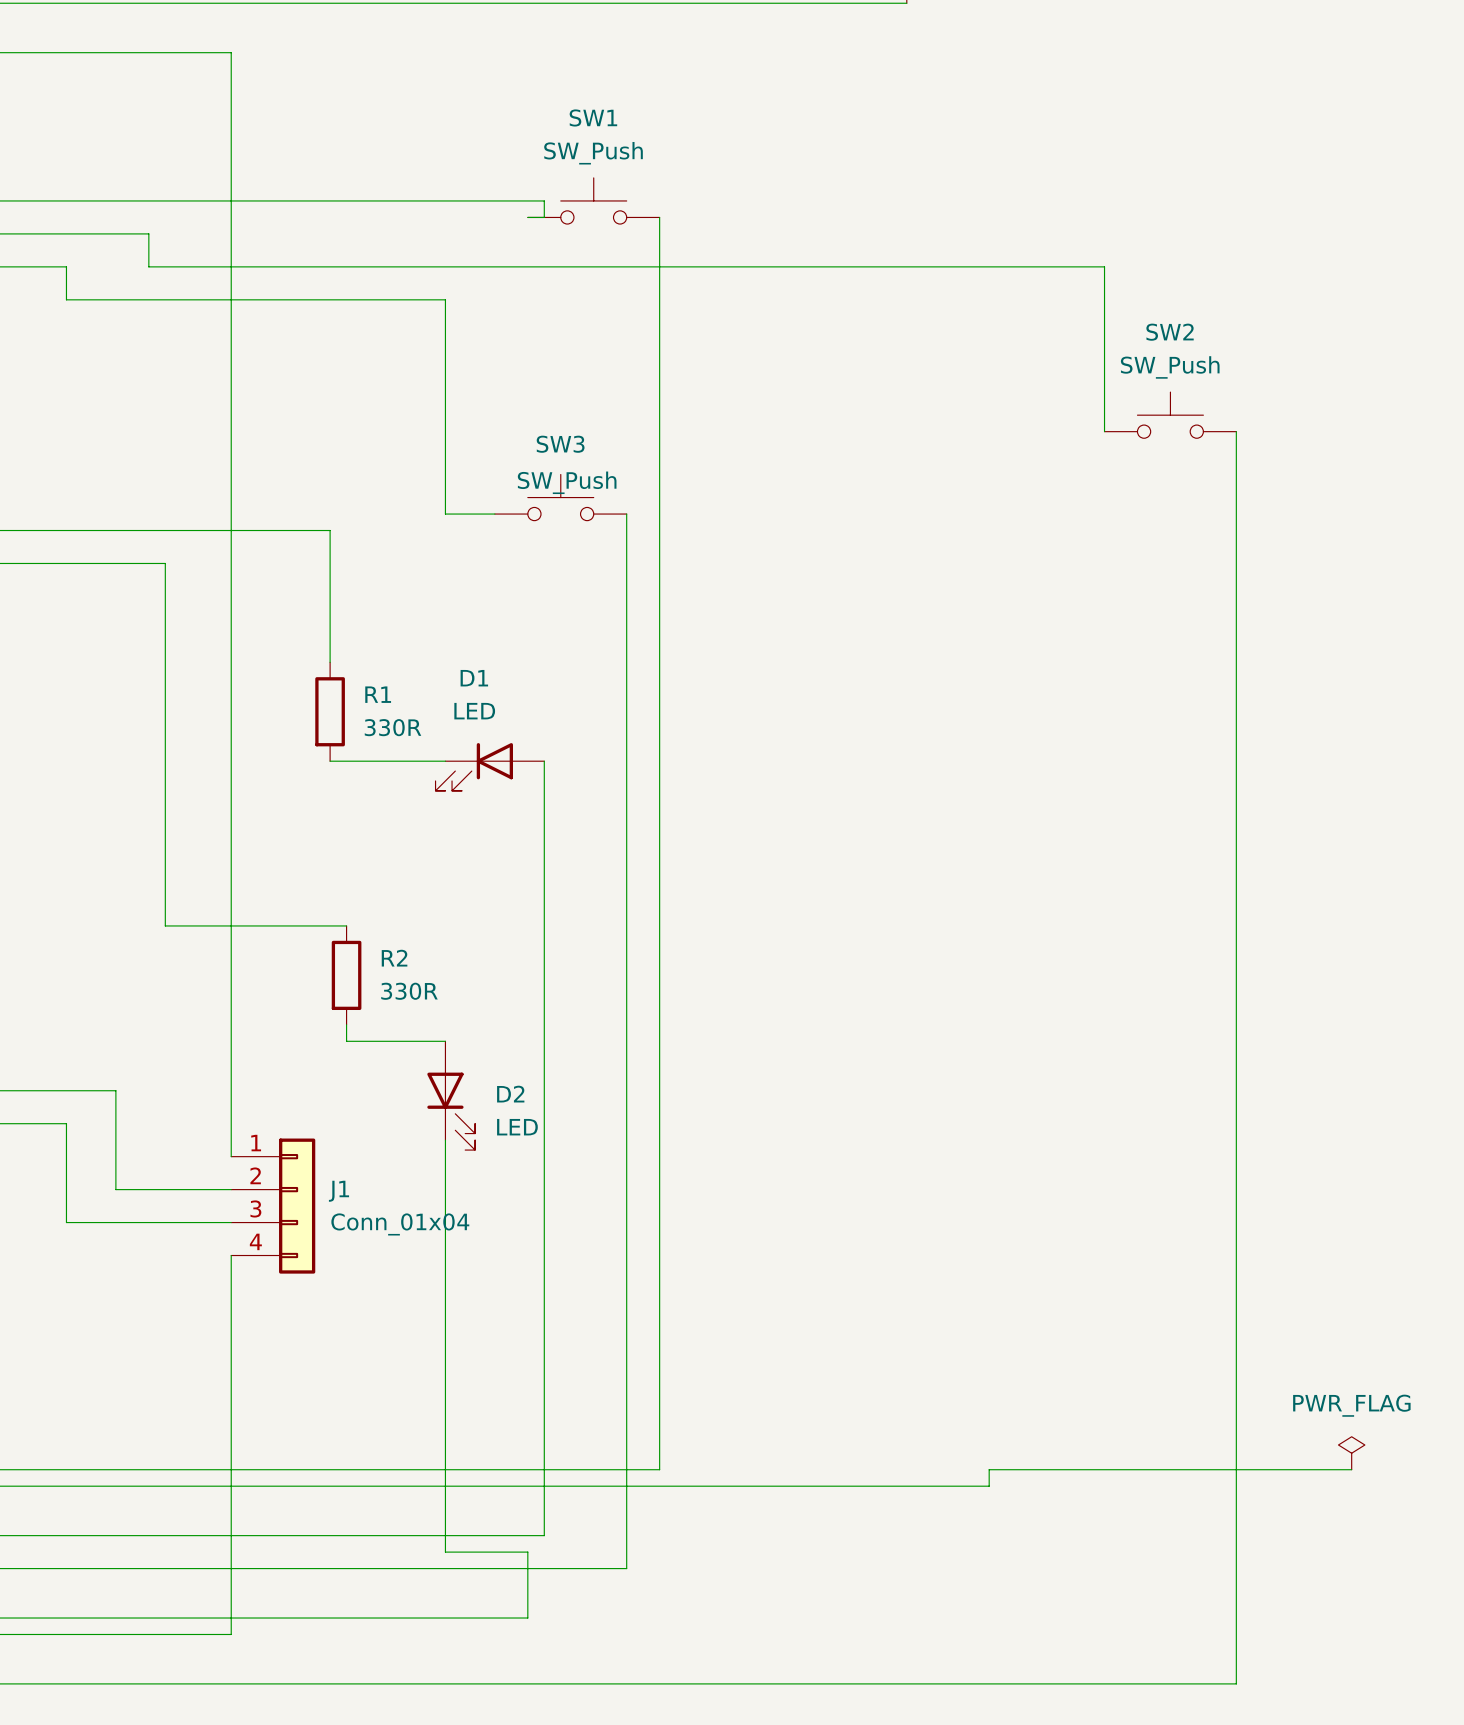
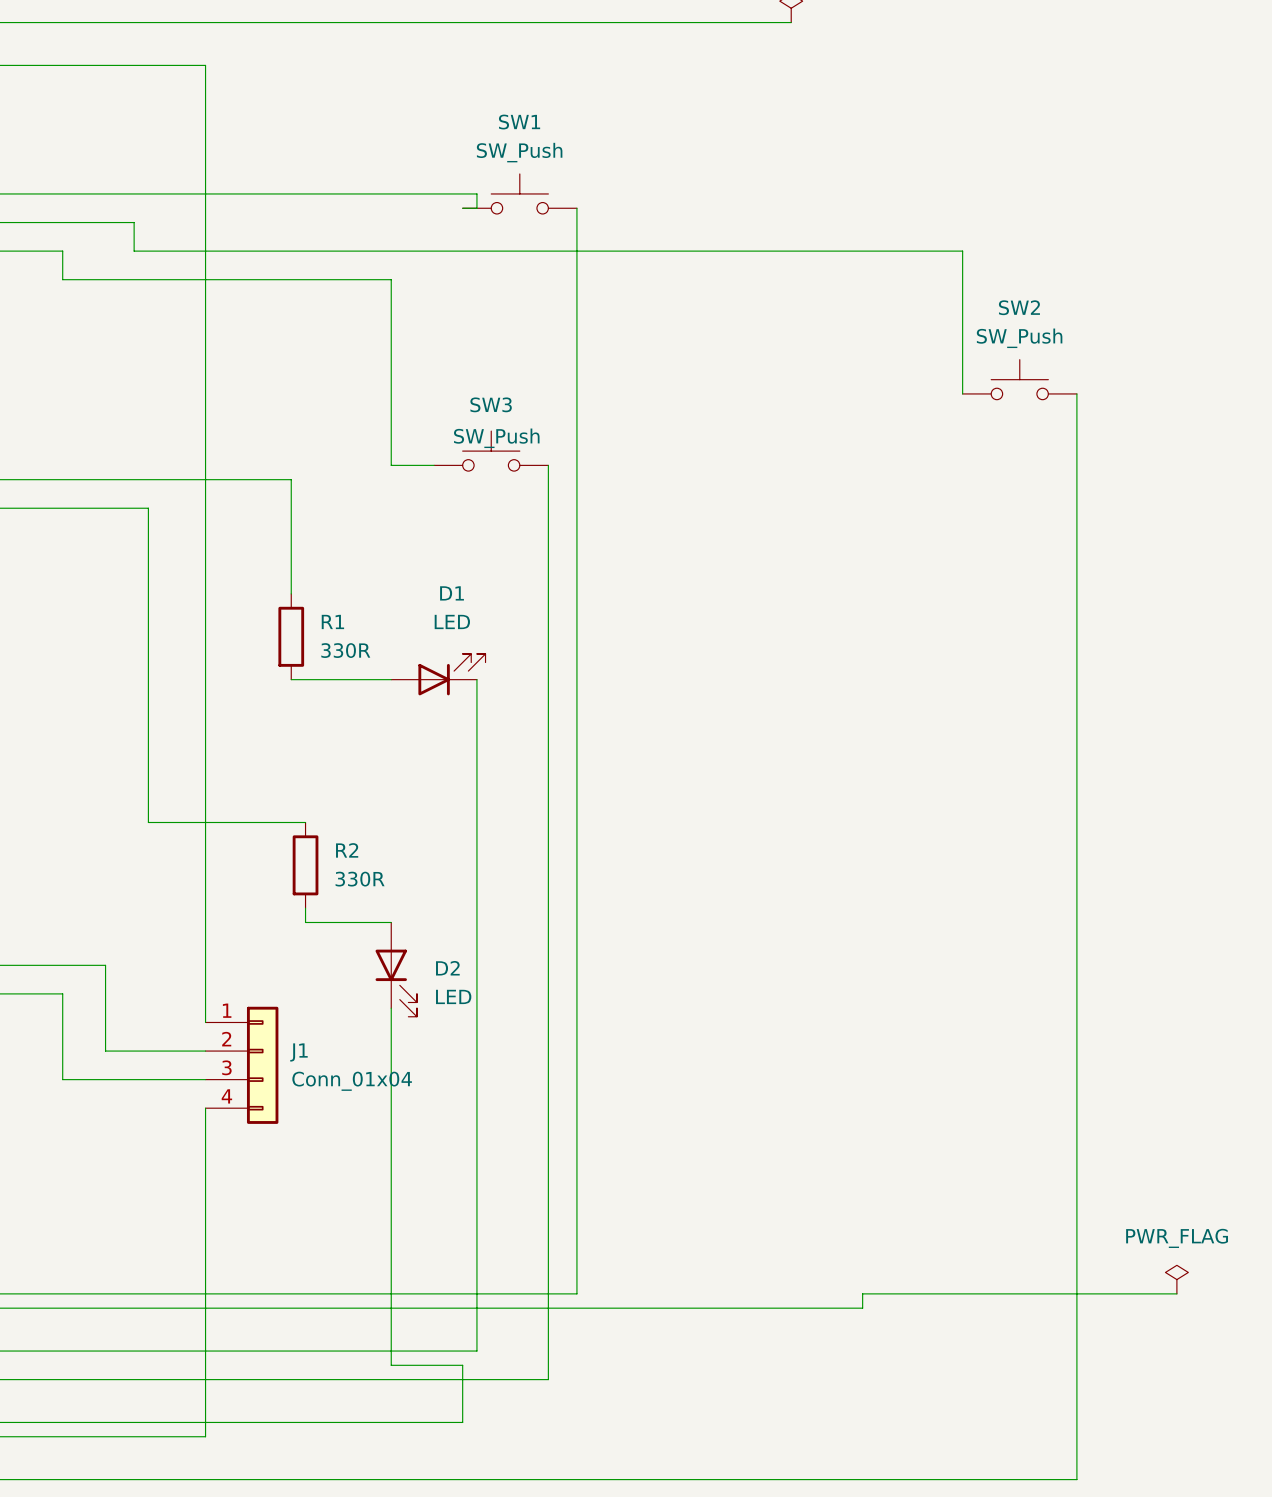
D1 name position: D1 (474, 678) -> D1 (452, 593)
D1 value position: LED (474, 711) -> LED (452, 621)
D1 rotation: 0° (474, 766) -> 180° (451, 674)

